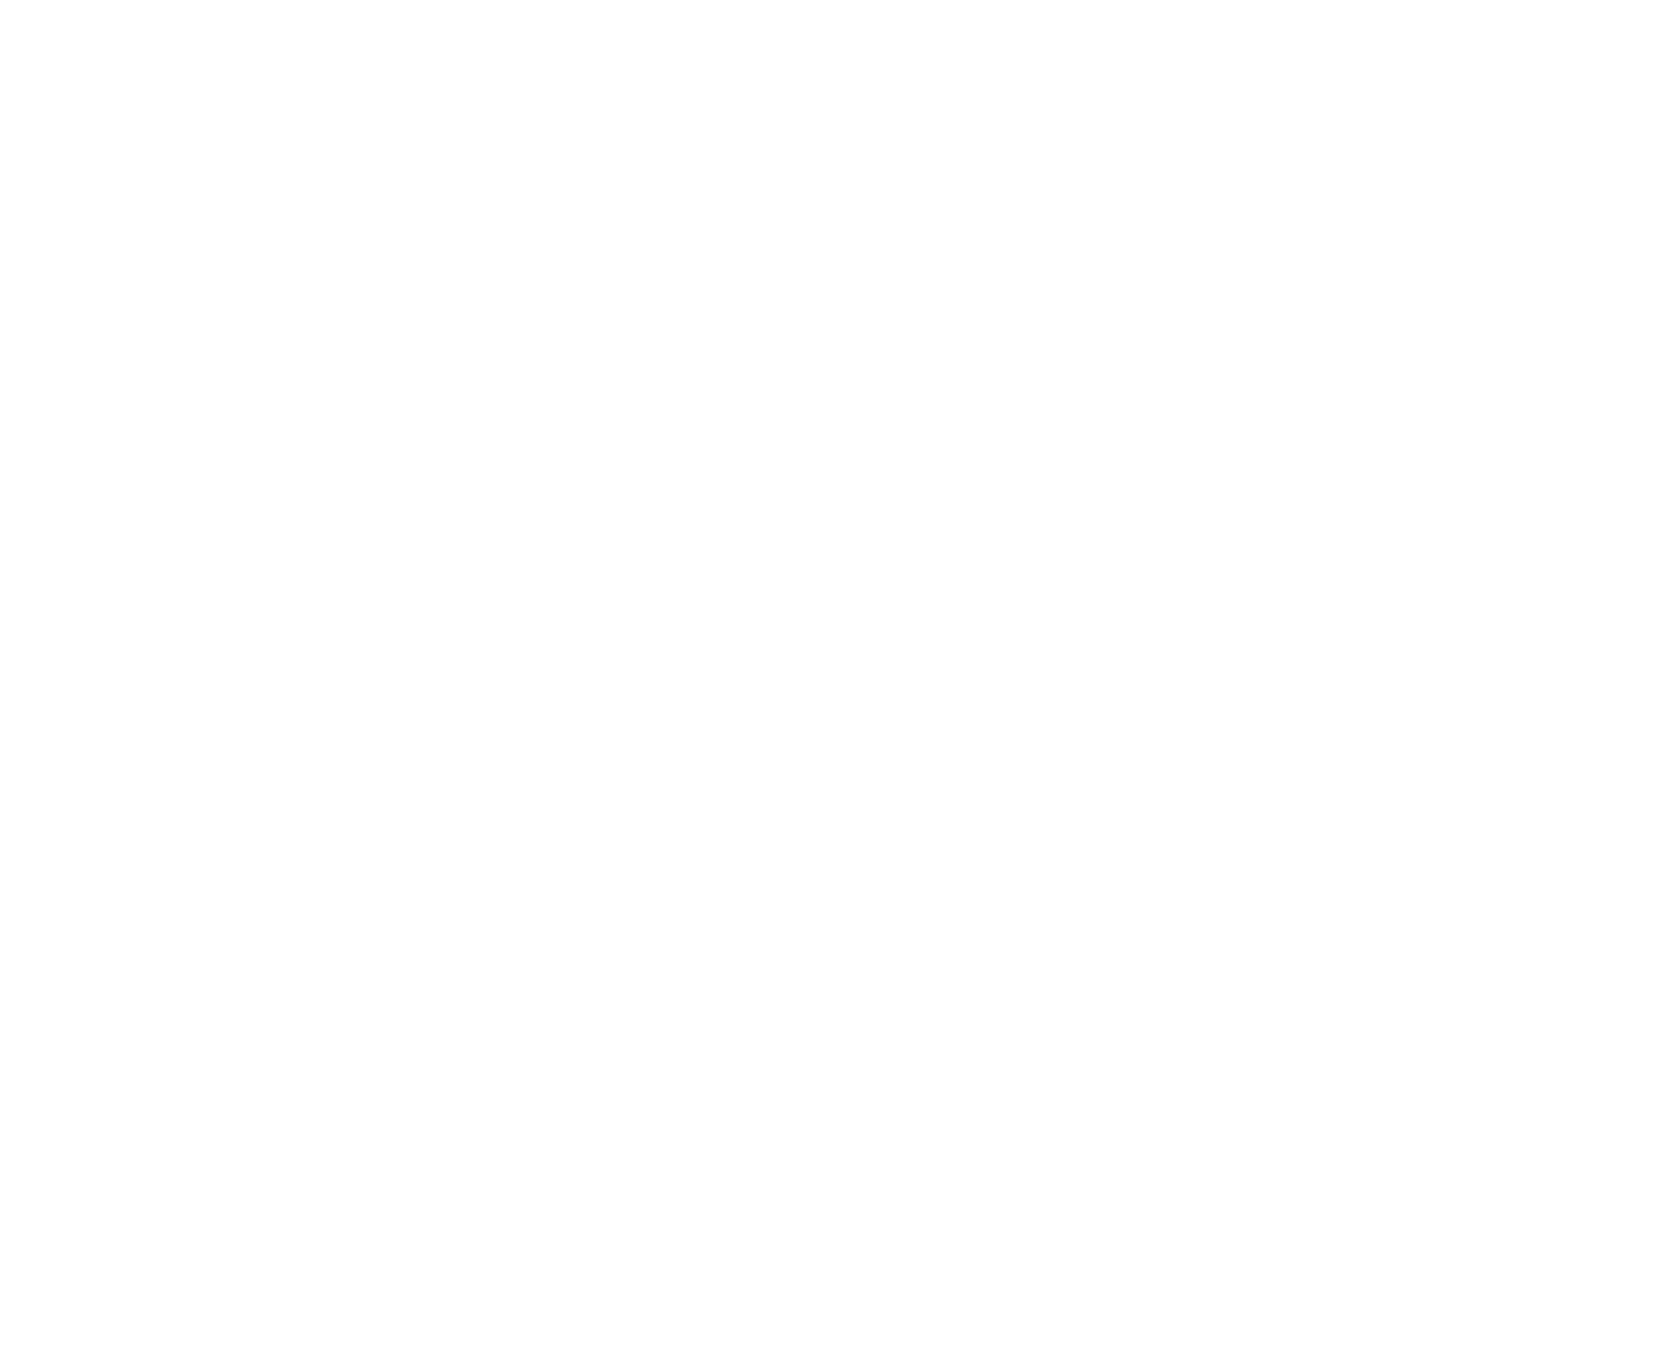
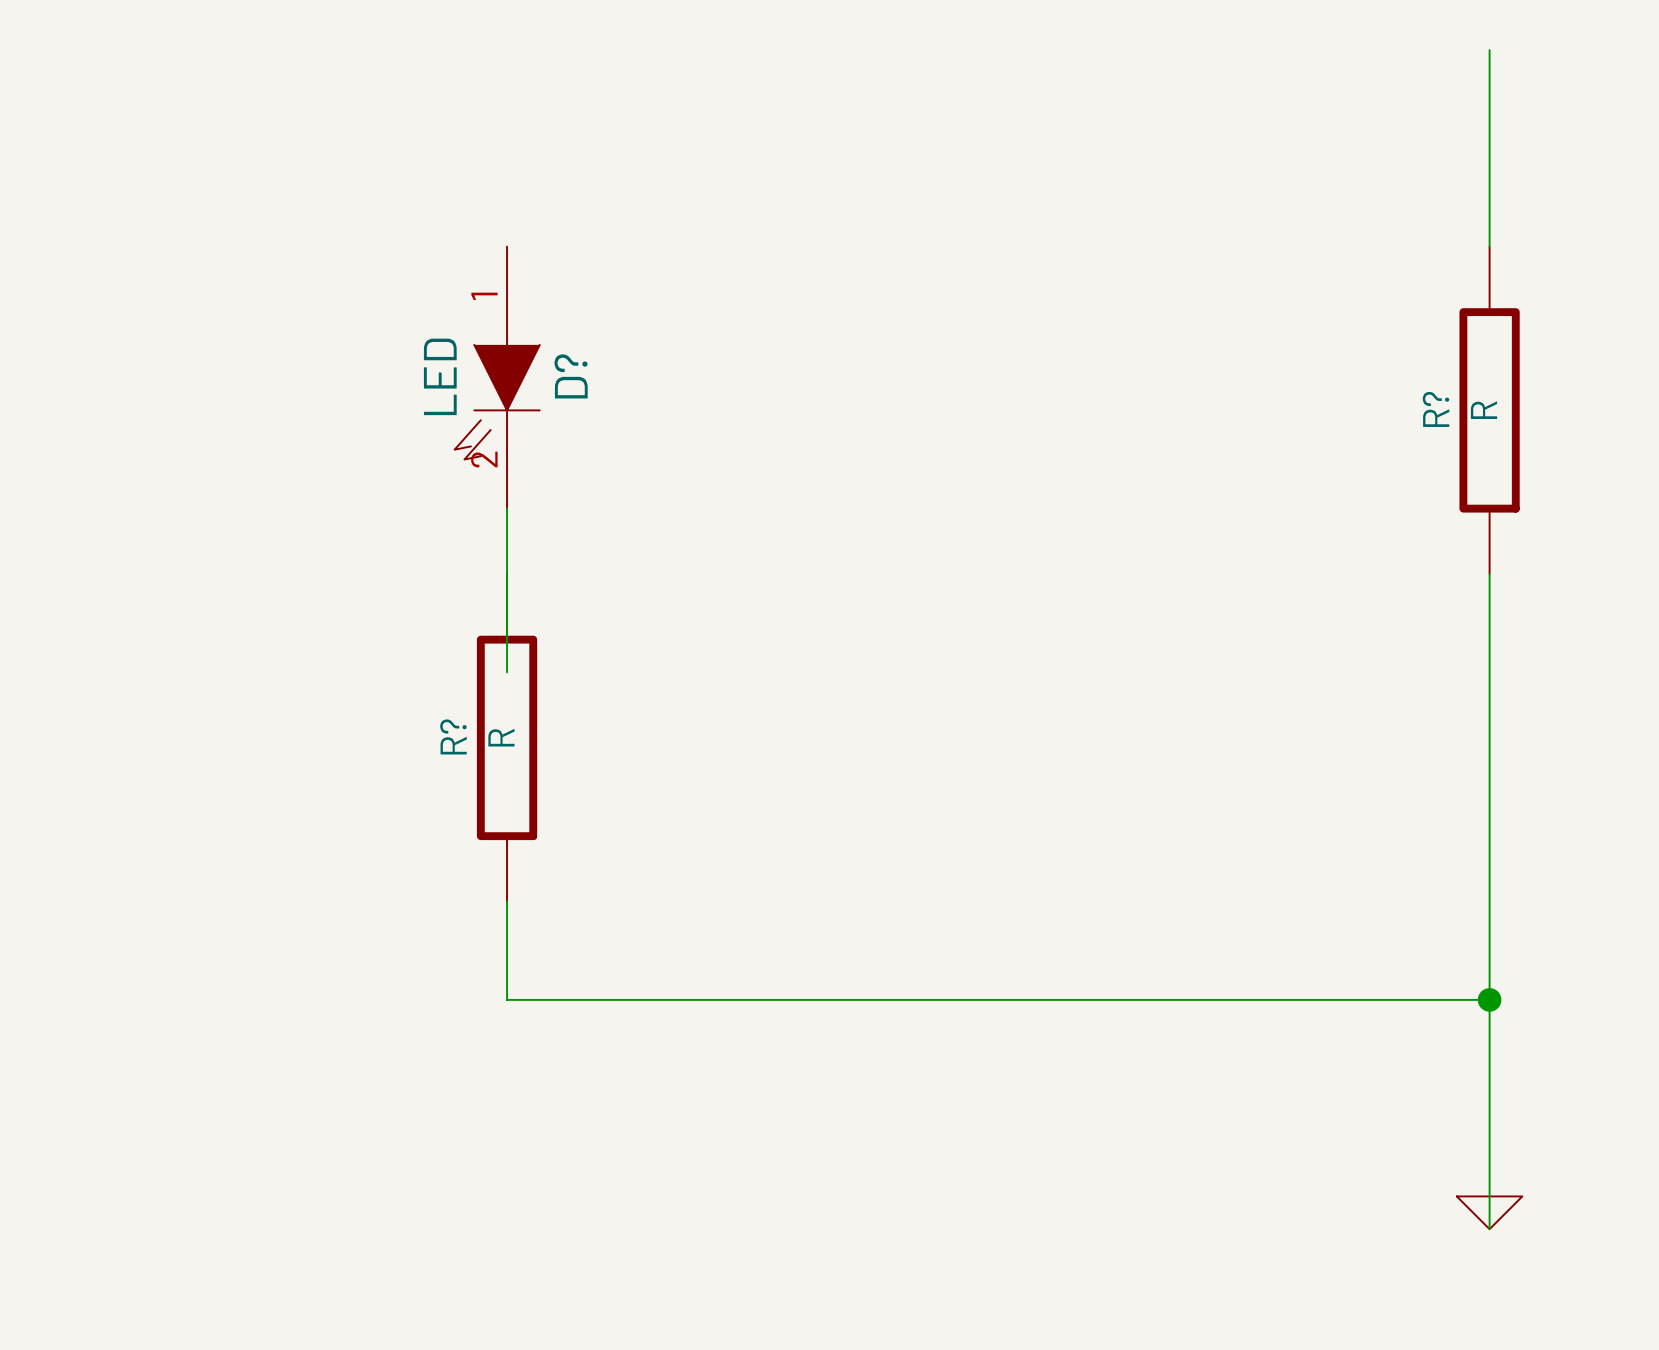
wire: none -> (1489, 50) (1489, 246)
D?: none -> LED (497, 377)
R?: none -> R (1489, 410)
wire: none -> (507, 508) (507, 672)
wire: none -> (1489, 574) (1489, 1229)
R?: none -> R (507, 737)
wire: none -> (507, 901) (507, 999) (1489, 999)
junction: none -> (1489, 999)
power symbol: none -> (1489, 1212)

